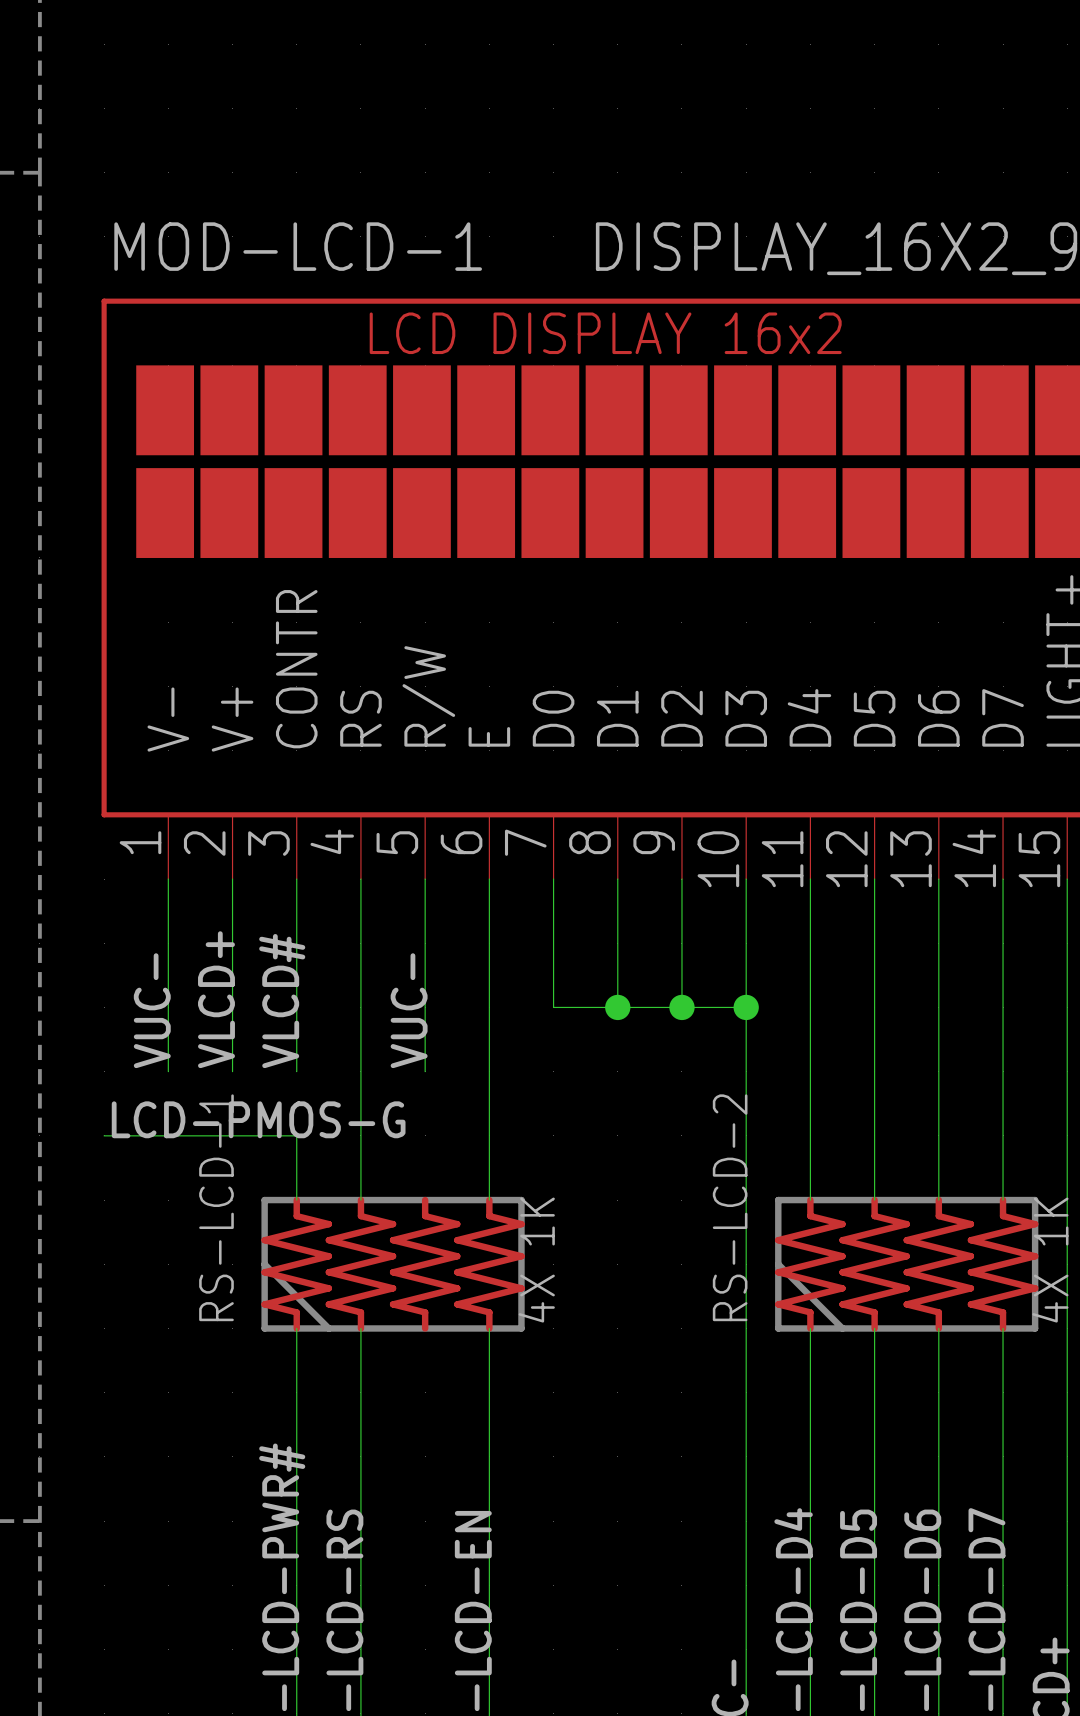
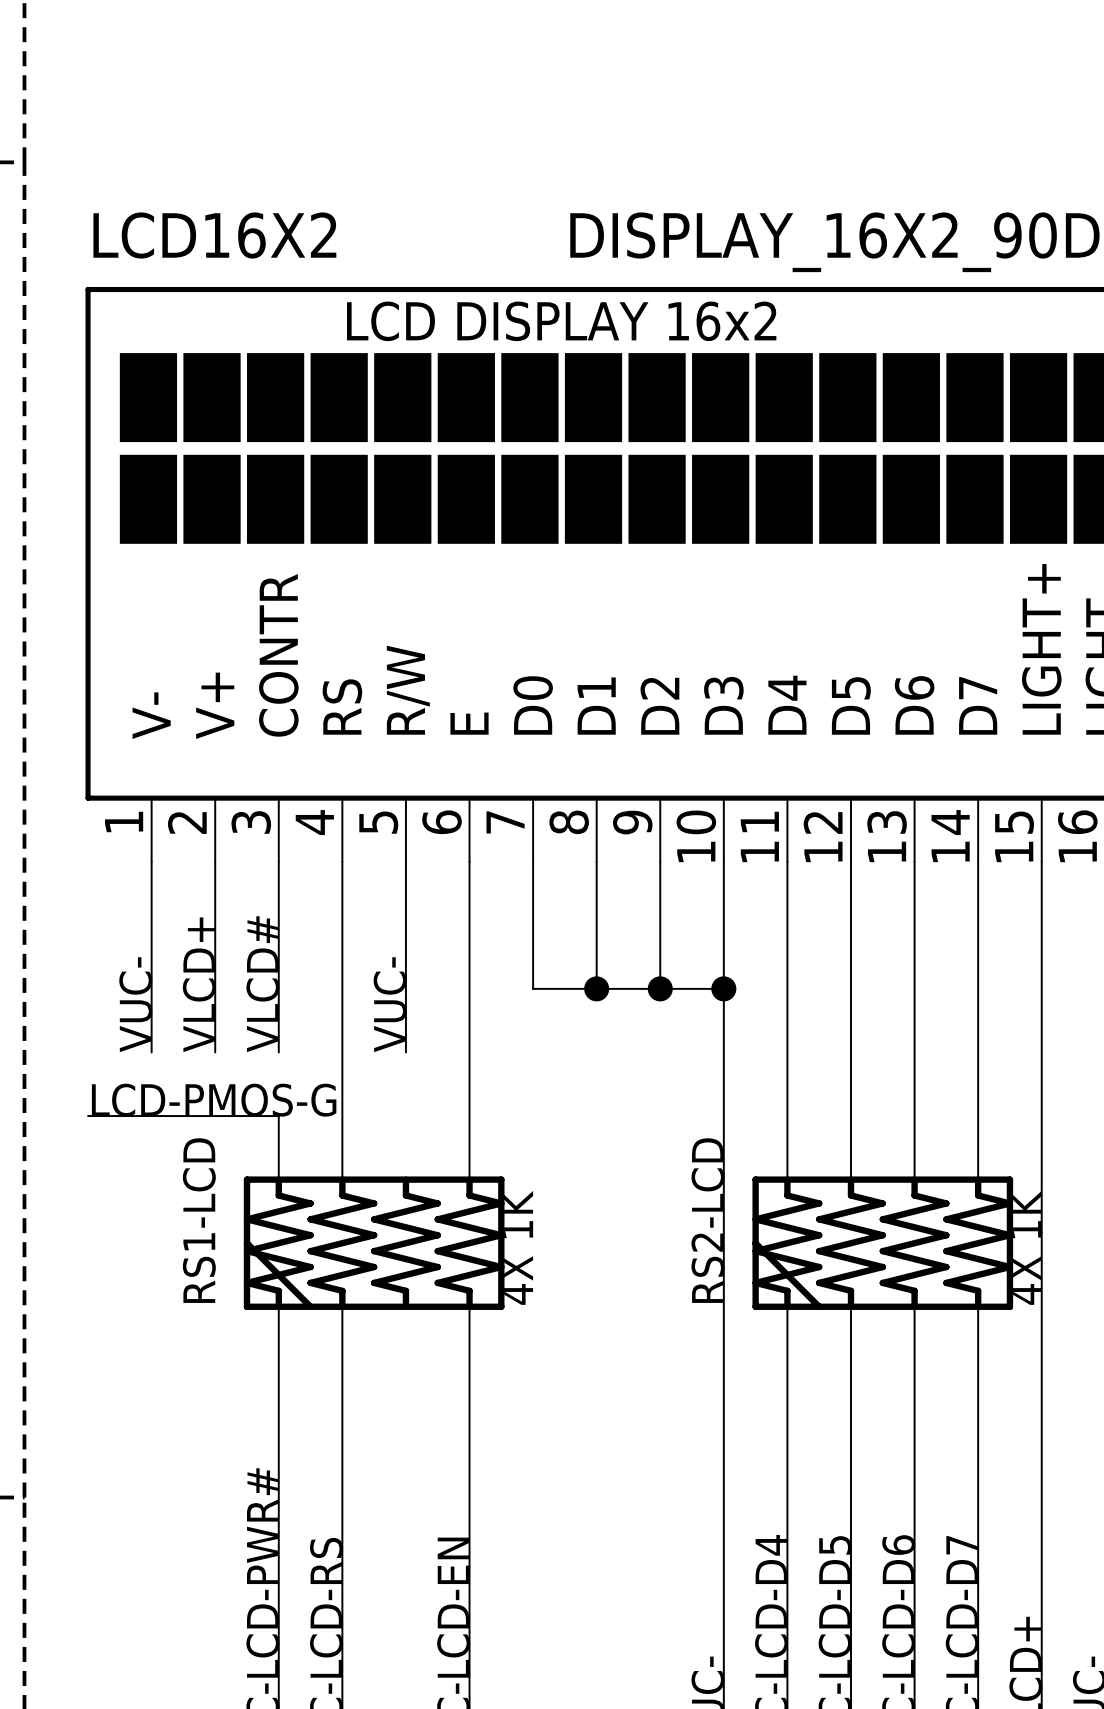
MOD-LCD-1 name: MOD-LCD-1 (298, 246) -> LCD16X2 (214, 235)
RS-LCD-1 name: RS-LCD-1 (216, 1207) -> RS1-LCD (199, 1220)
RS-LCD-2 name: RS-LCD-2 (730, 1207) -> RS2-LCD (707, 1220)

